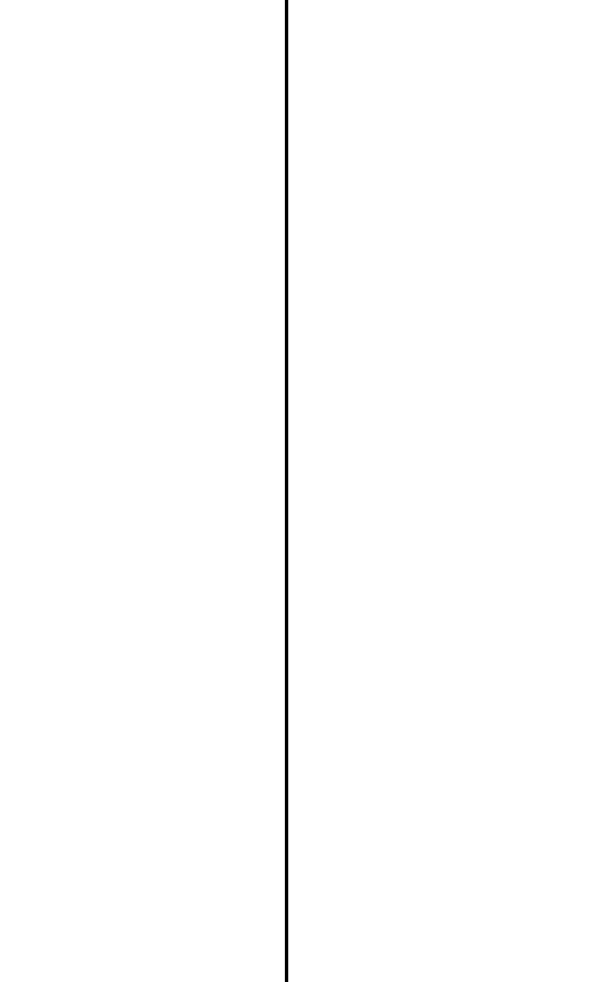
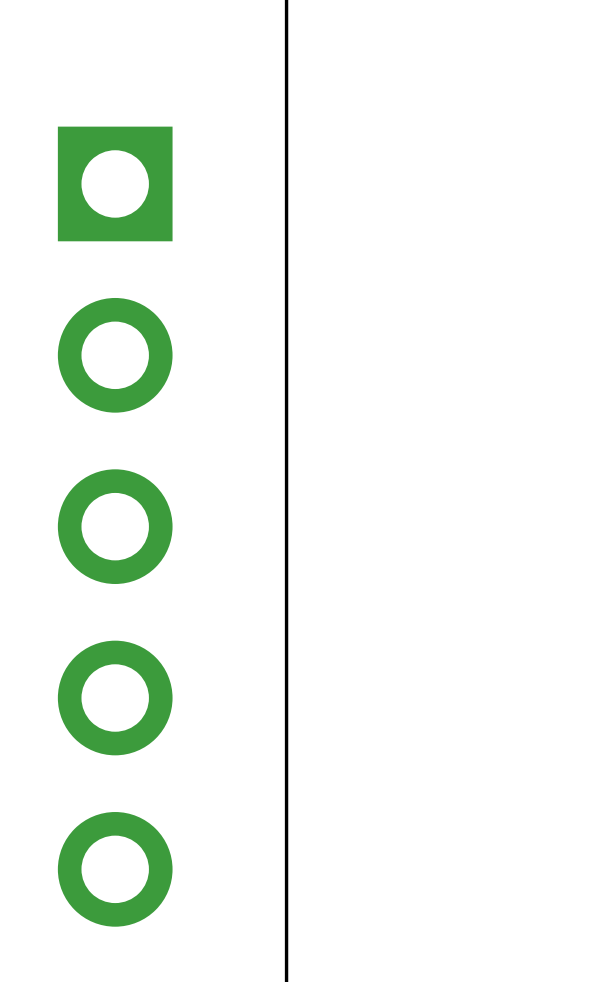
part: none -> (115, 526)

